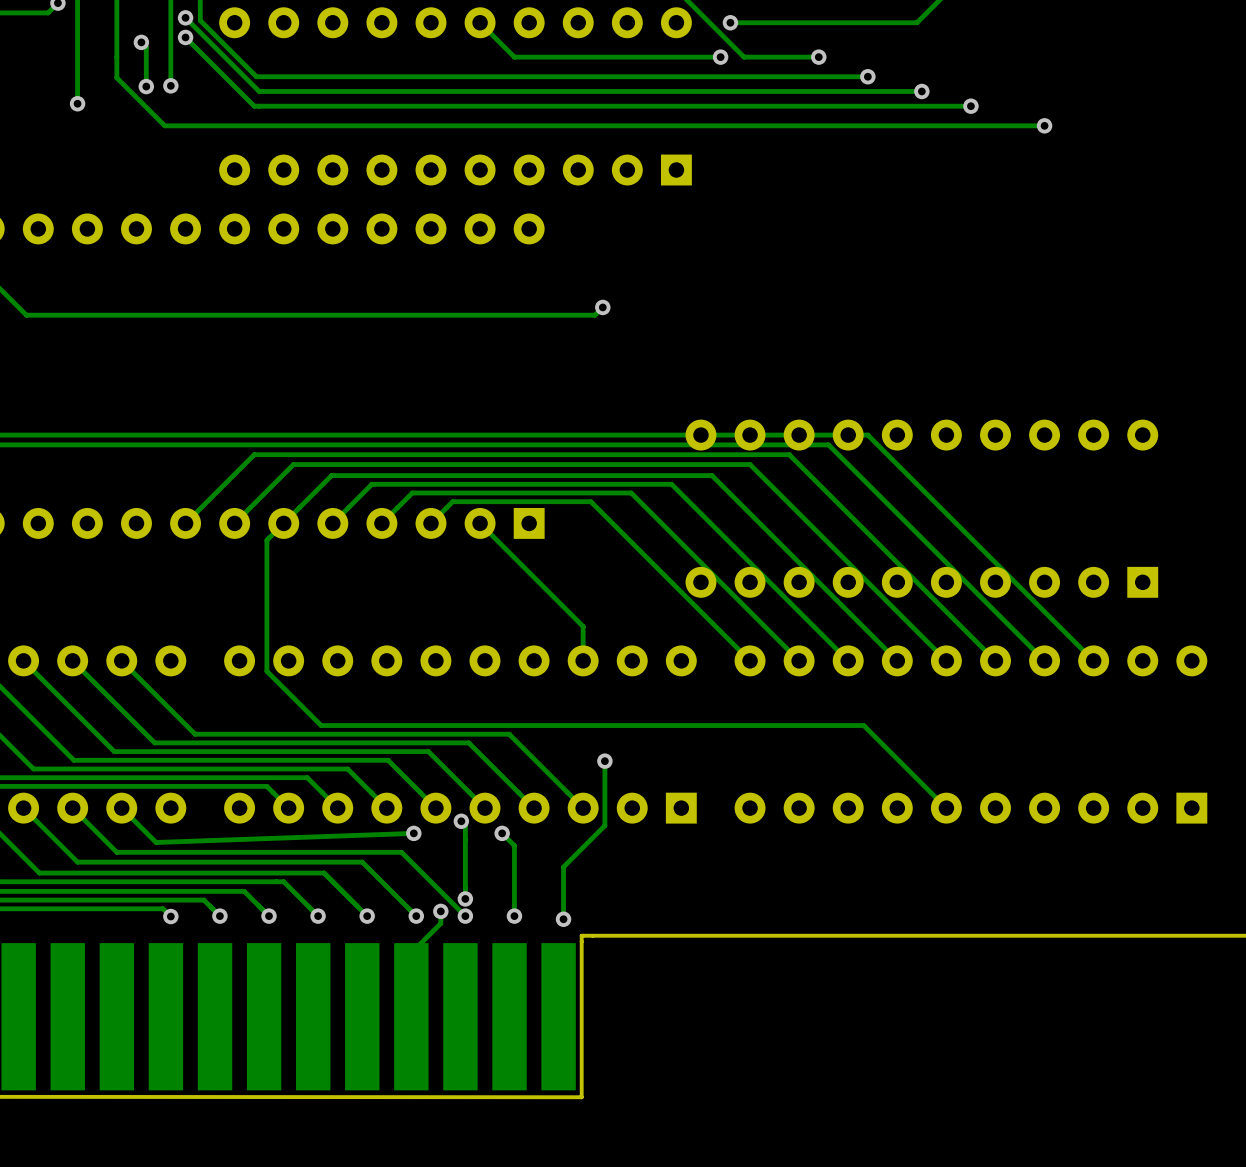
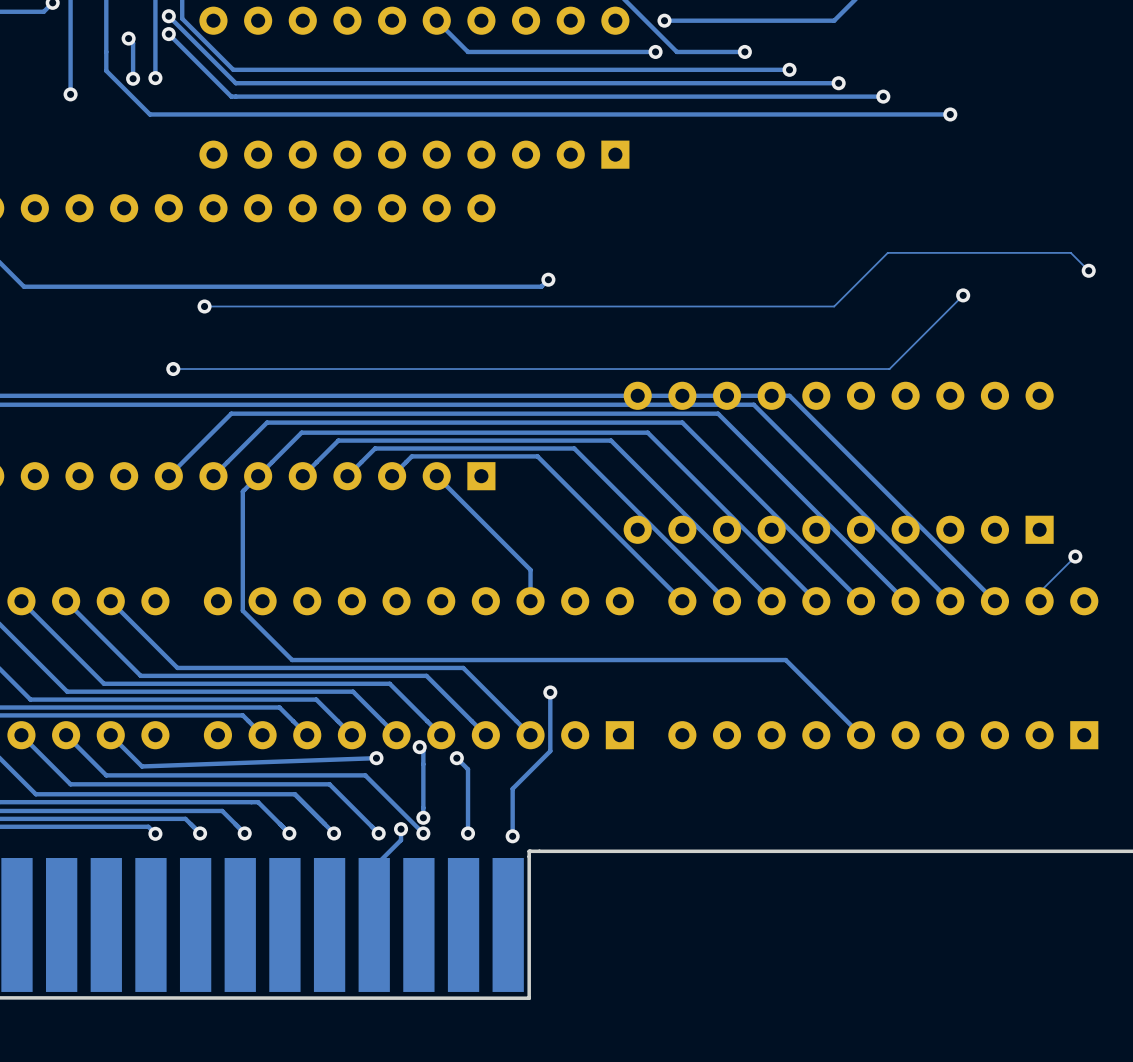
track: none -> (1088, 270) (1070, 252) (887, 252) (834, 306) (204, 306)
via: none -> (1088, 270)
track: none -> (963, 295) (889, 369) (173, 369)
via: none -> (963, 295)
via: none -> (204, 306)
via: none -> (173, 369)
track: none -> (1075, 556) (1039, 592) (1039, 601)
via: none -> (1075, 556)

